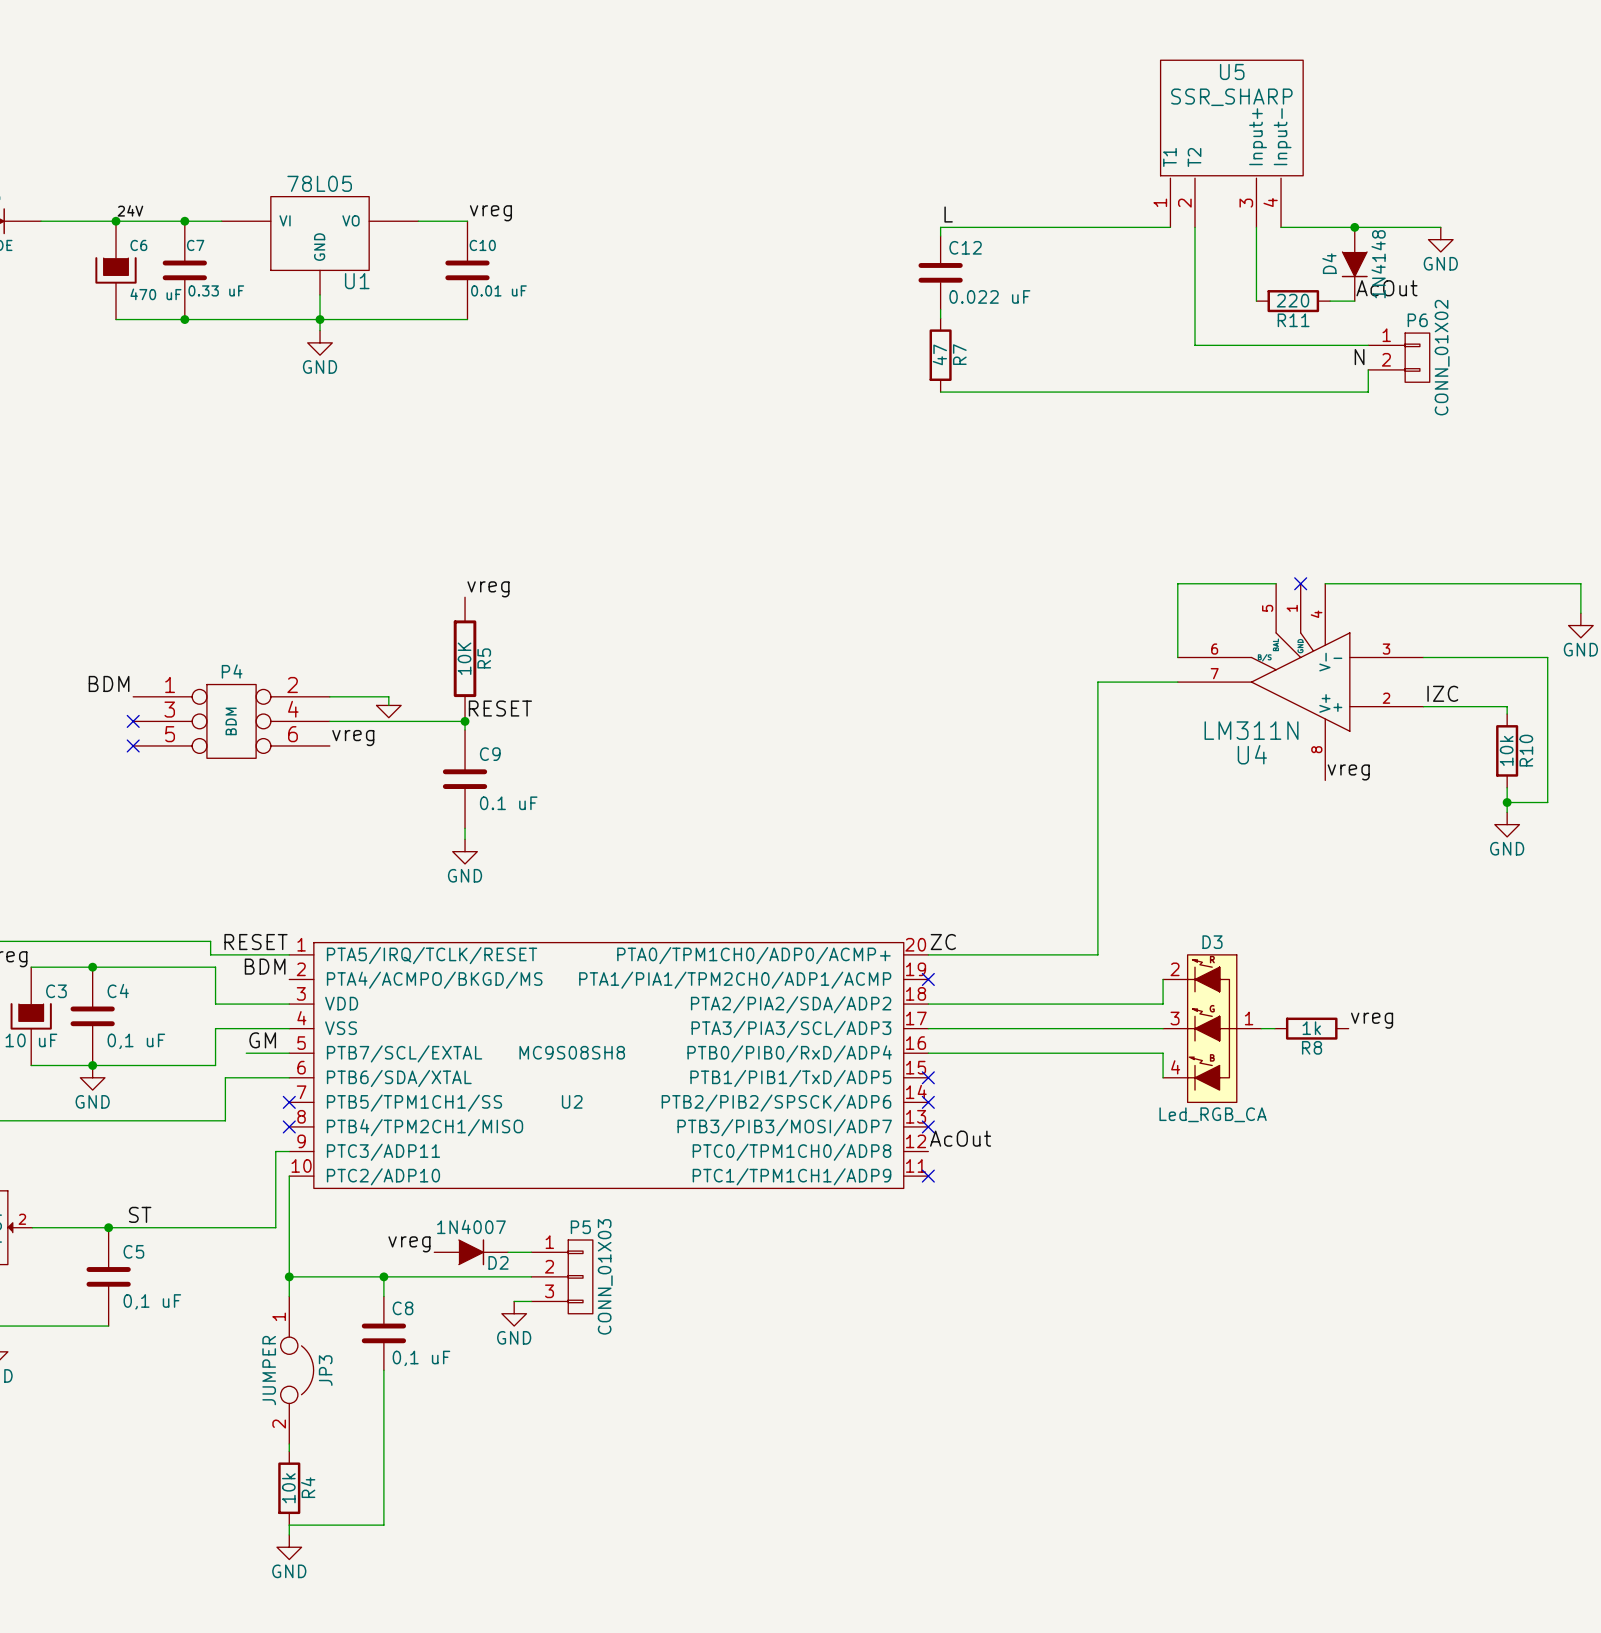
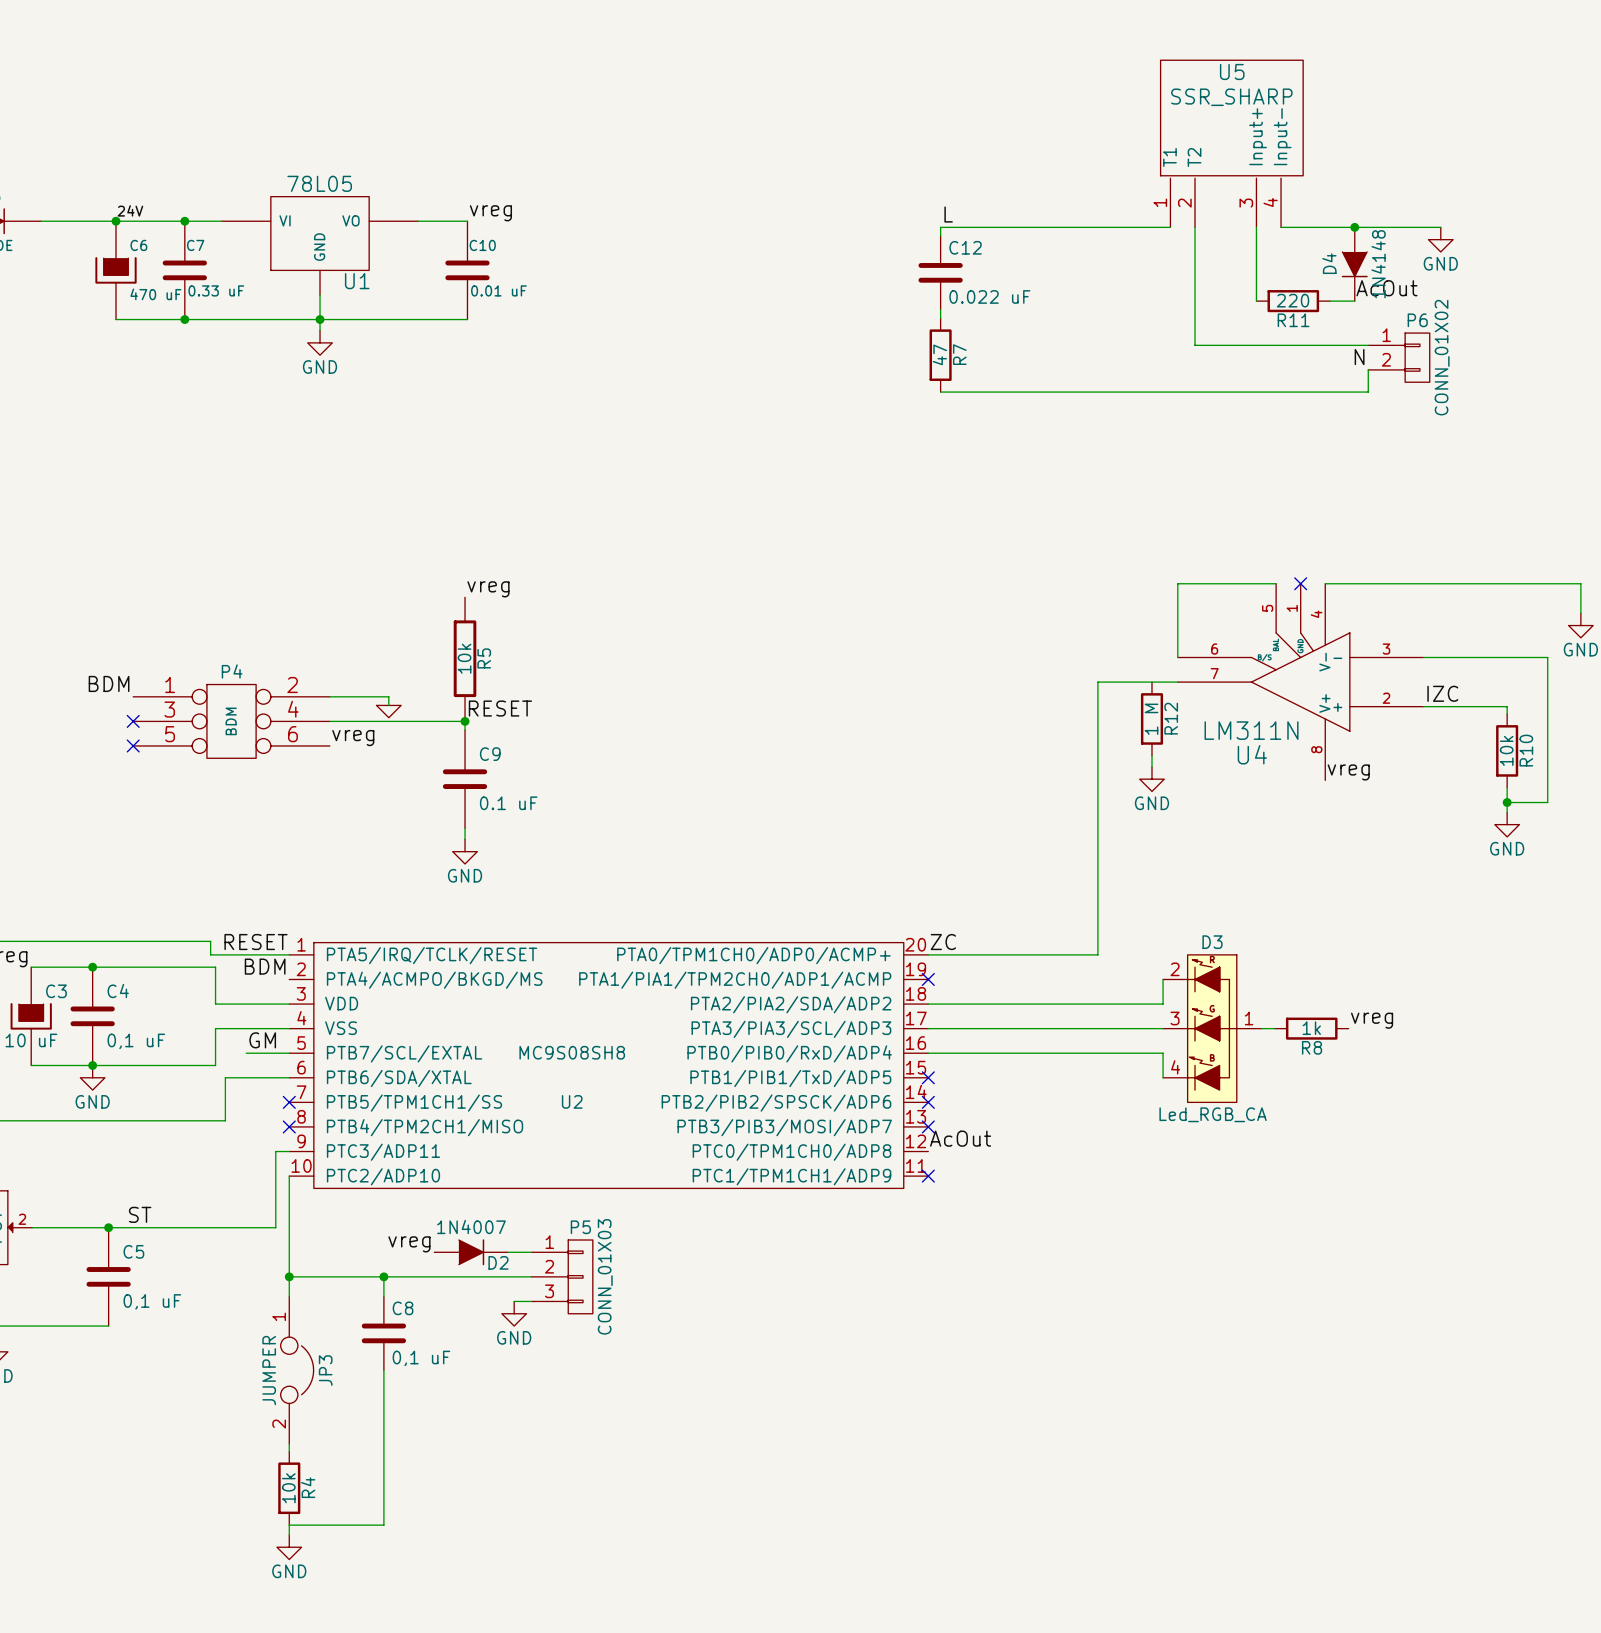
R5 value: 10K (464, 658) -> 10k (464, 658)
R12: none -> 1 M (1151, 718)
wire: none -> (1151, 755) (1151, 766)
power symbol: none -> GND (1151, 779)

